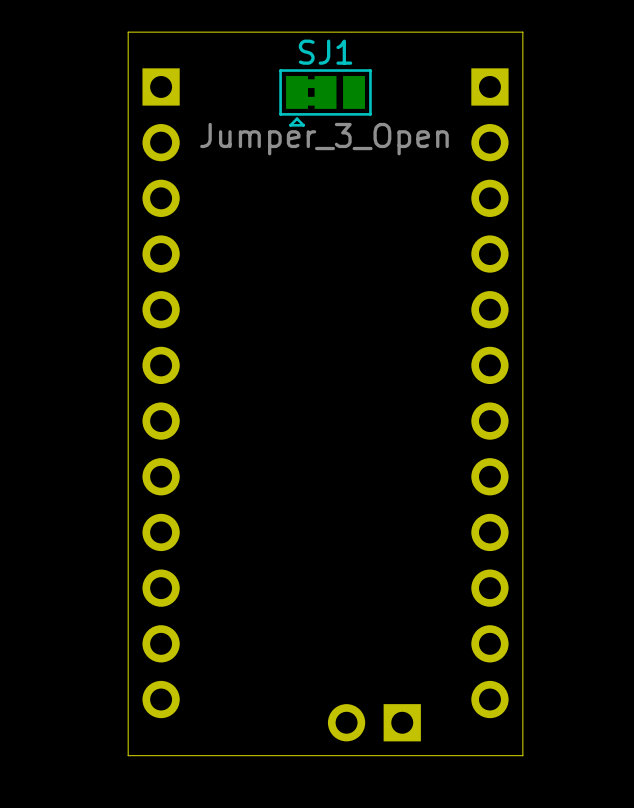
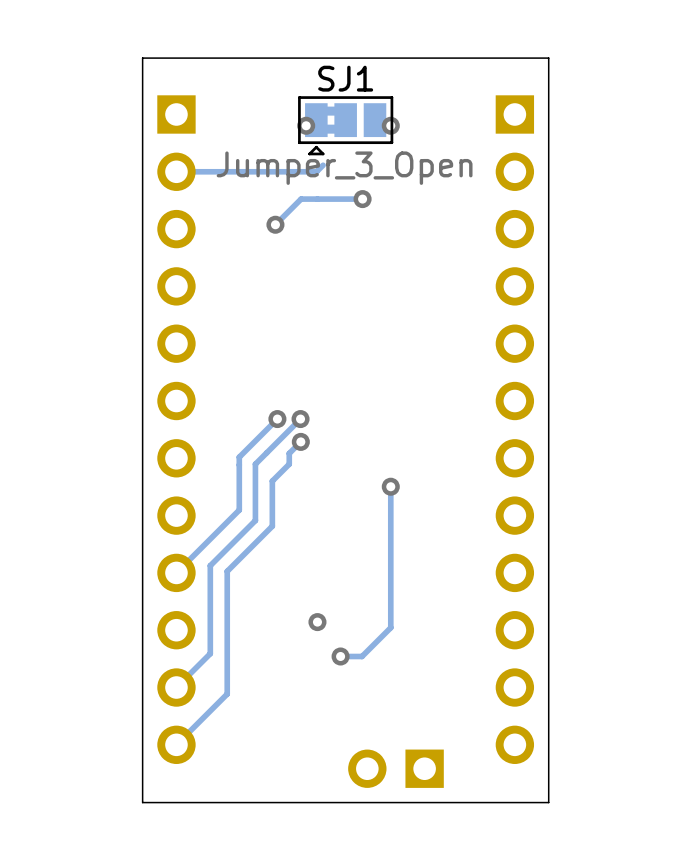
via: none -> (306, 125)
via: none -> (390, 125)
track: none -> (323, 165) (316, 171) (176, 171)
track: none -> (362, 199) (301, 199) (275, 224)
via: none -> (362, 199)
via: none -> (275, 224)
track: none -> (277, 419) (239, 457) (239, 510) (176, 572)
via: none -> (277, 419)
track: none -> (300, 419) (255, 464) (255, 520) (210, 565) (210, 653) (176, 687)
via: none -> (300, 419)
track: none -> (300, 441) (289, 453) (289, 464) (272, 481) (272, 526) (227, 571) (227, 694) (176, 744)
via: none -> (300, 441)
track: none -> (390, 486) (390, 627) (362, 656) (340, 656)
via: none -> (390, 486)
via: none -> (317, 622)
via: none -> (340, 656)

